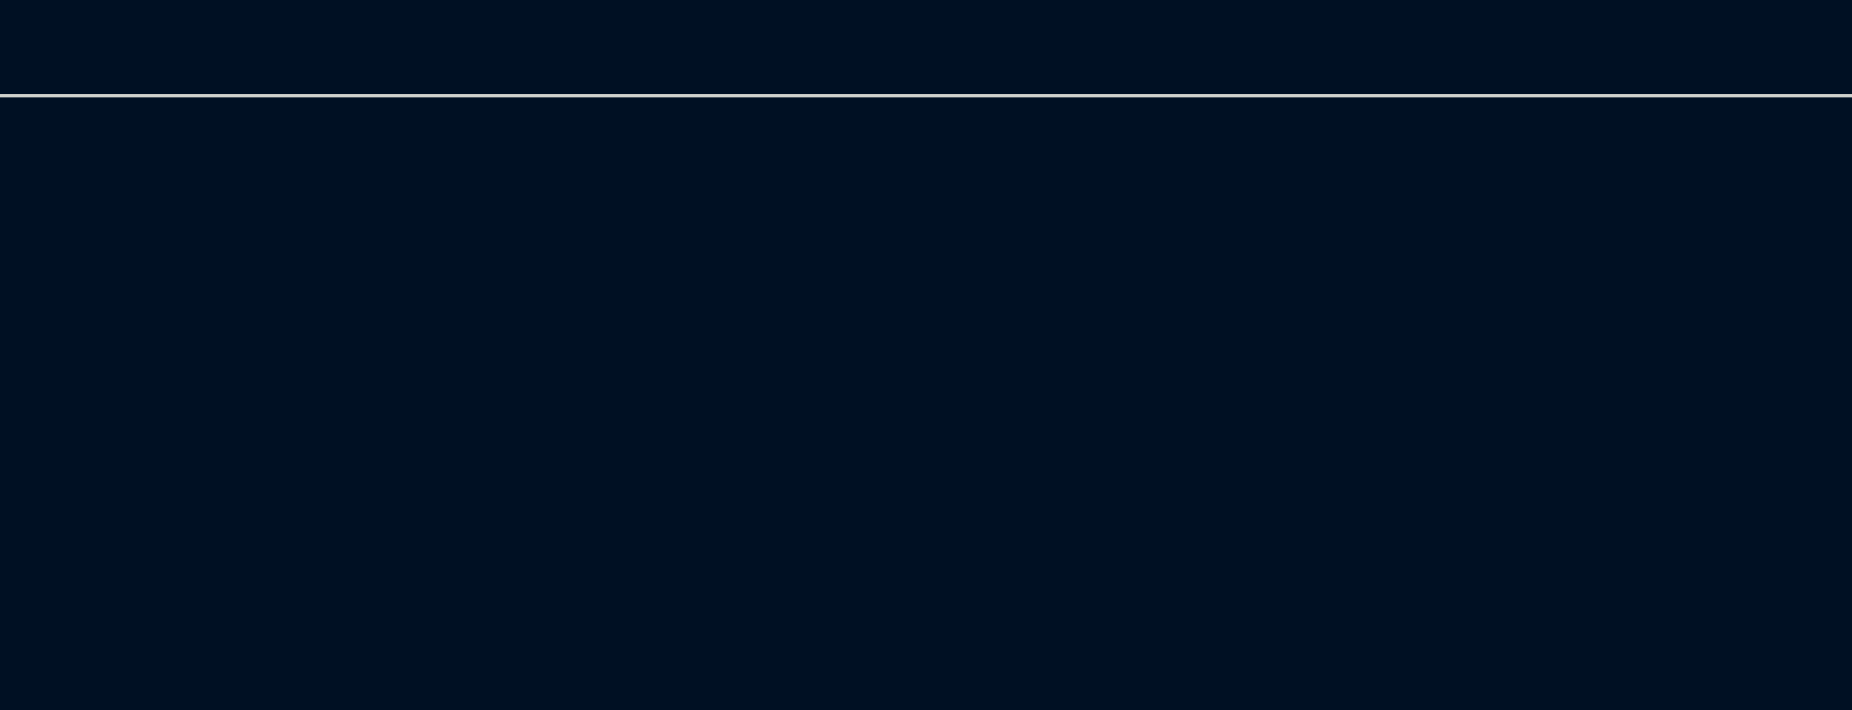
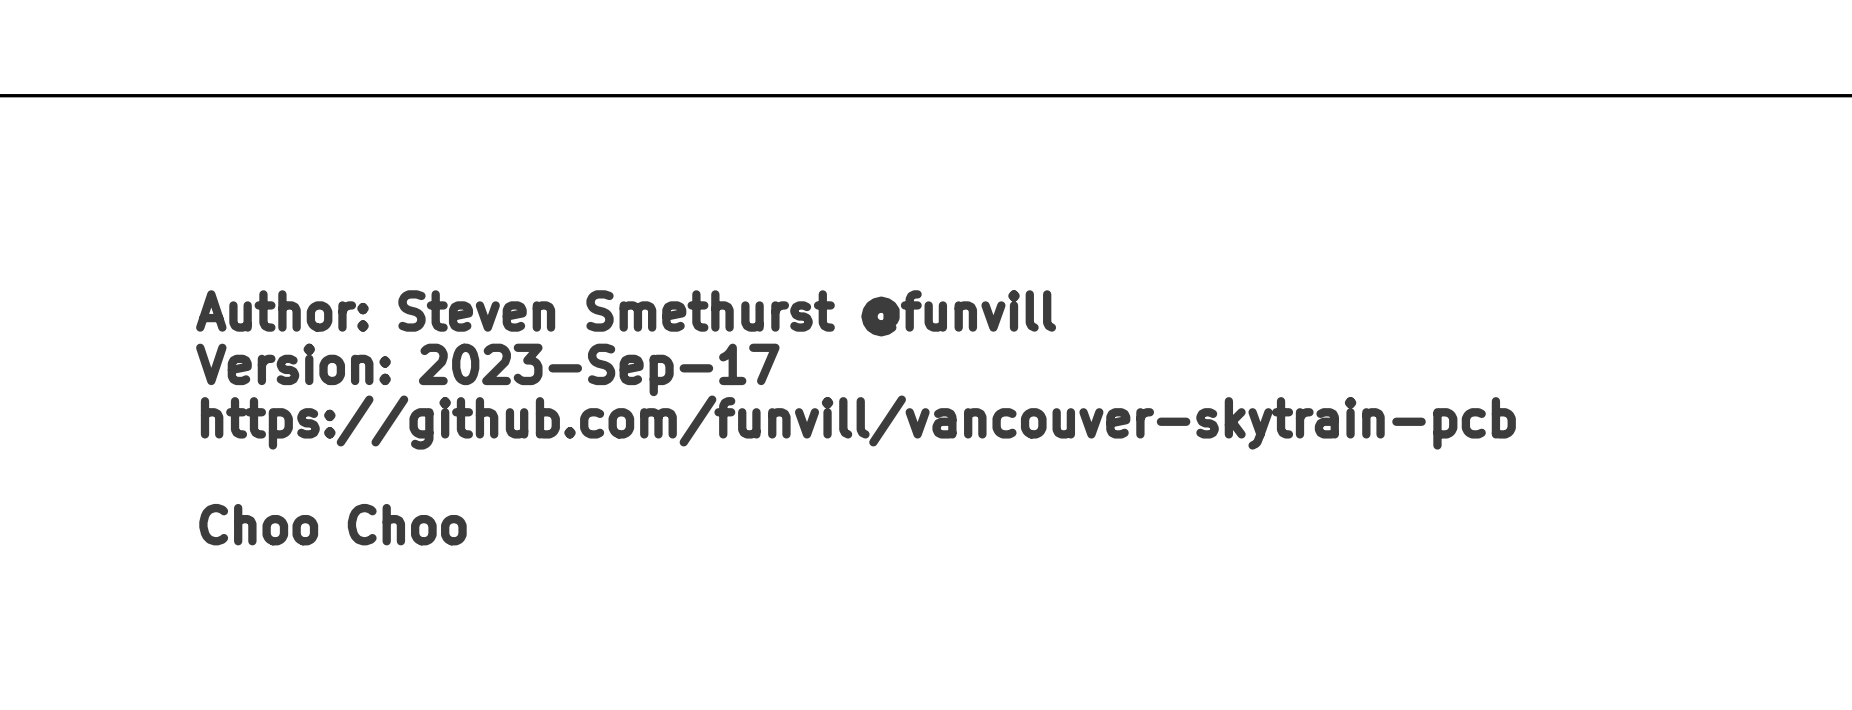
text: none -> Author: Steven Smethurst @funvill (626, 313)
text: none -> Version: 2023-Sep-17 (487, 369)
text: none -> https://github.com/funvill/vancouver-skytrain-pcb (858, 422)
text: none -> Choo Choo (332, 524)

